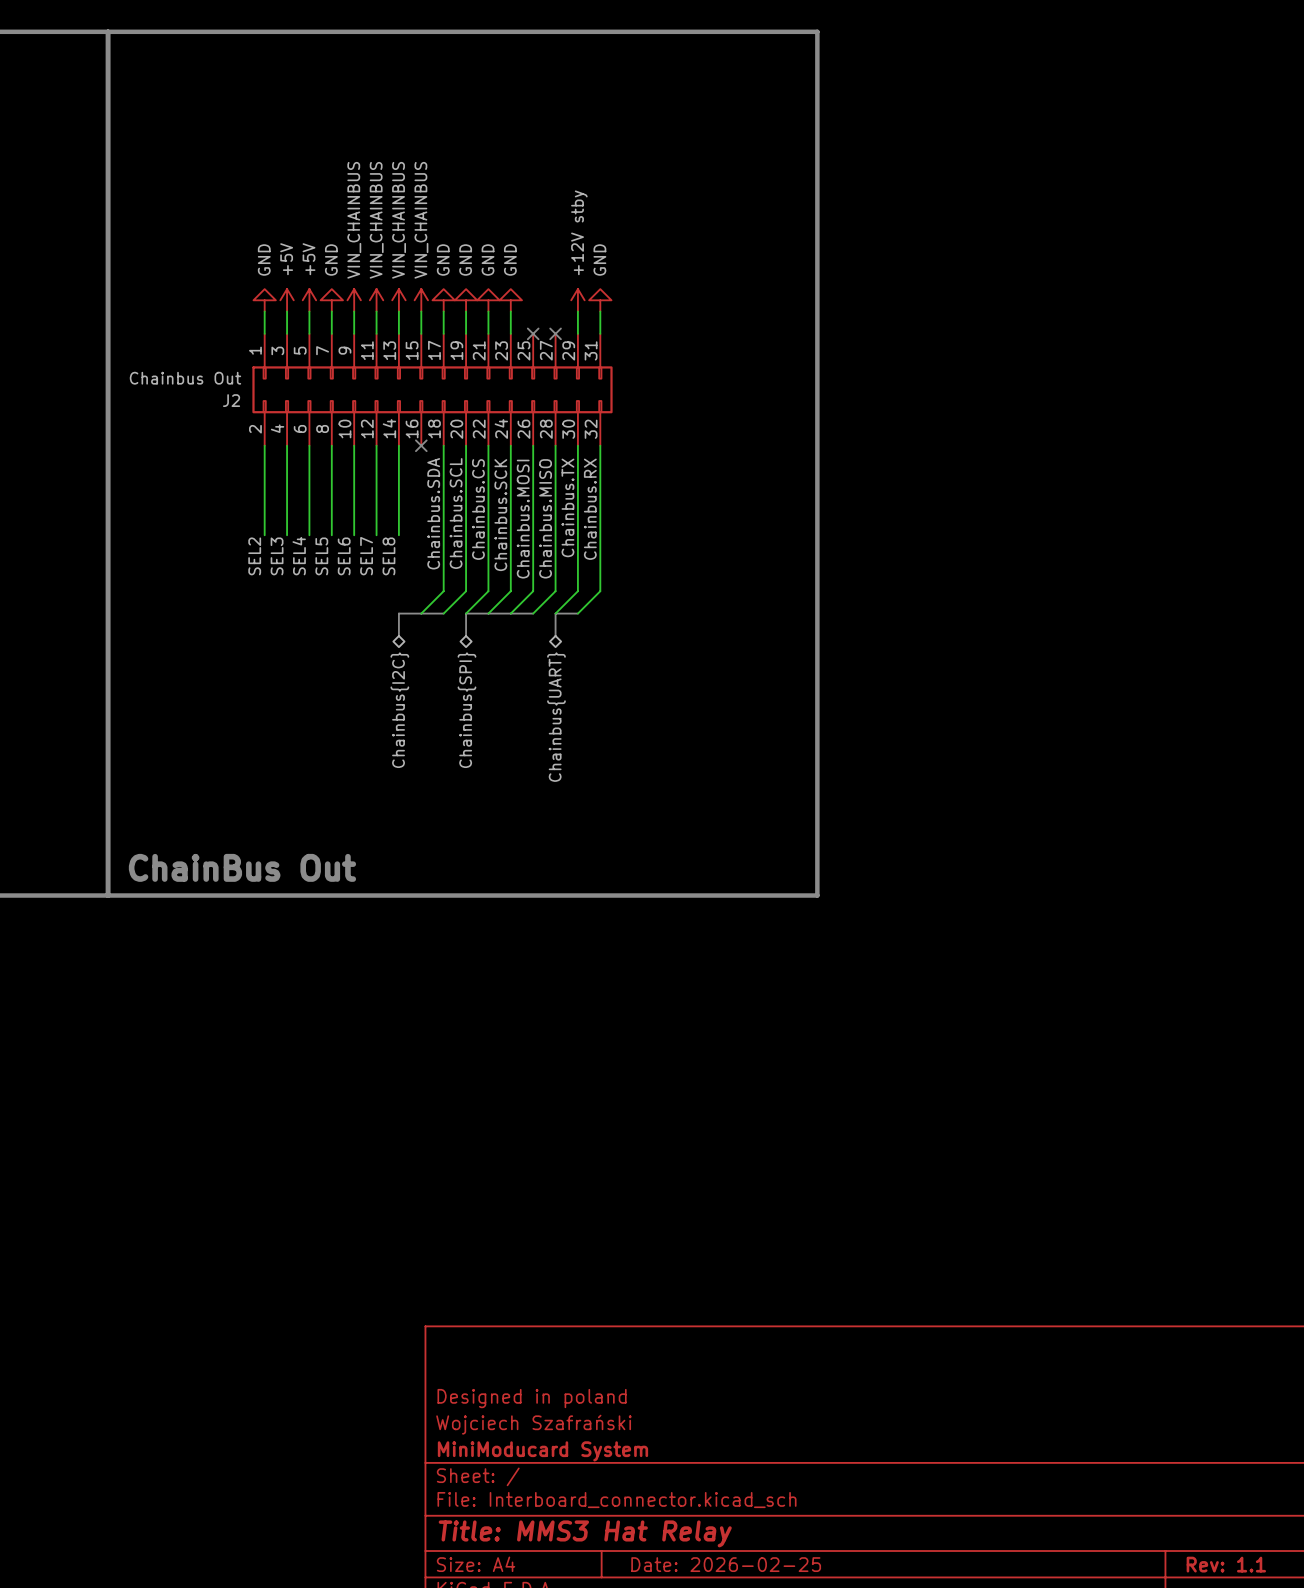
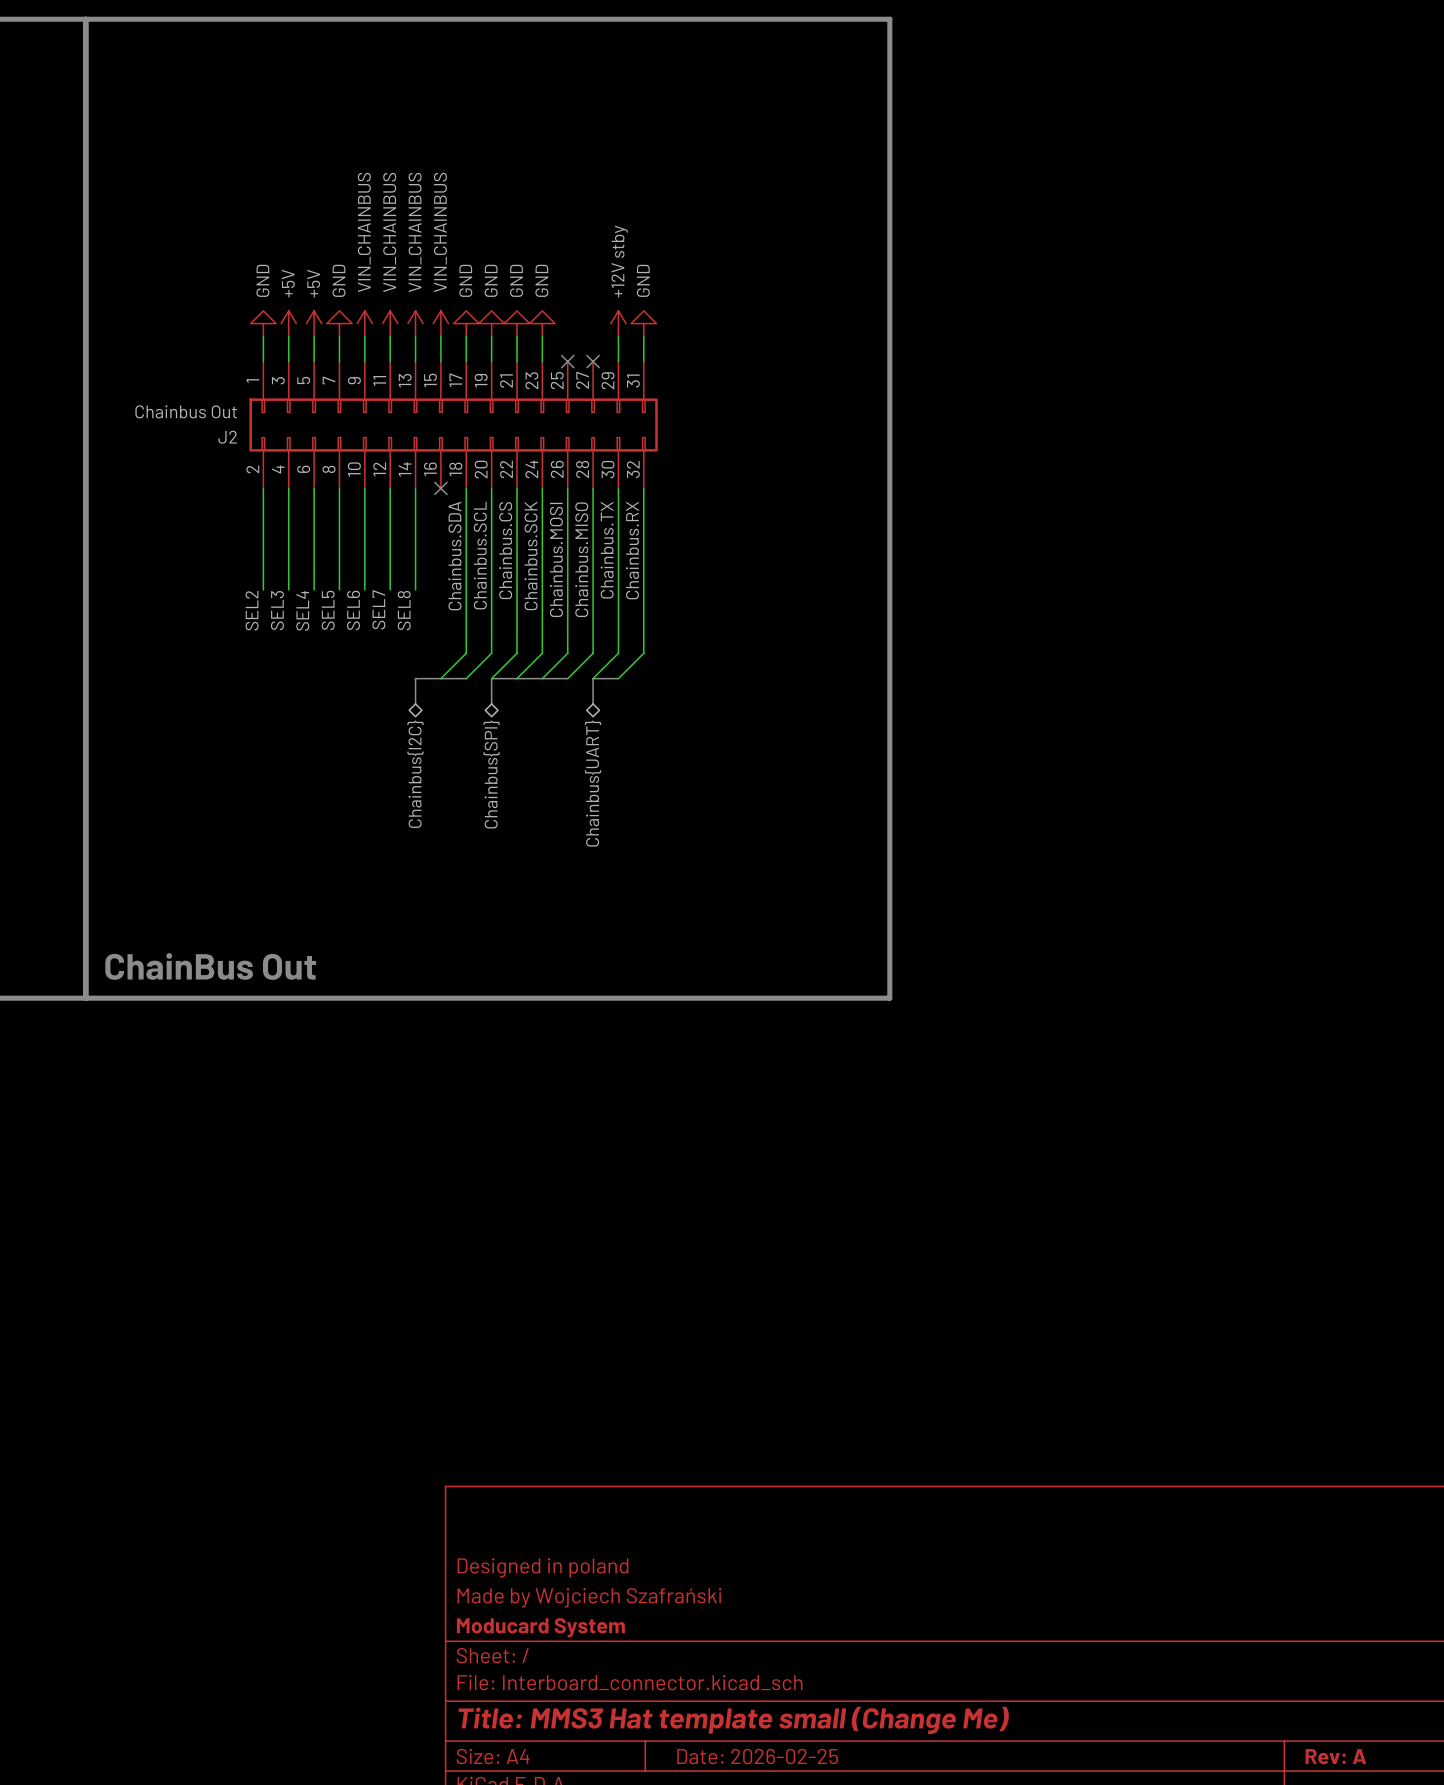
title block: Wojciech Szafrański (533, 1424) -> Made by Wojciech Szafrański (589, 1597)
title block: MiniModucard System (542, 1451) -> Moducard System (540, 1627)
title block: Title: MMS3 Hat Relay (585, 1533) -> Title: MMS3 Hat template small (Change Me) (733, 1720)
title block: Rev: 1.1 (1226, 1564) -> Rev: A (1335, 1756)

